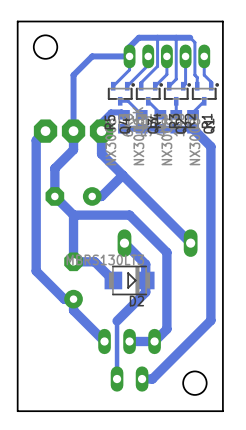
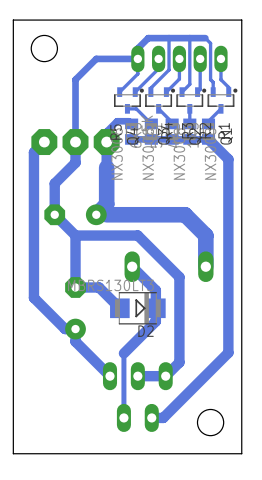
bottom track: (101, 154) (190, 243) -> (106, 214) (185, 214) (205, 235) (205, 266)
bottom track: none -> (106, 167) (106, 204) (96, 214)
bottom track: (122, 175) (101, 196) -> none

